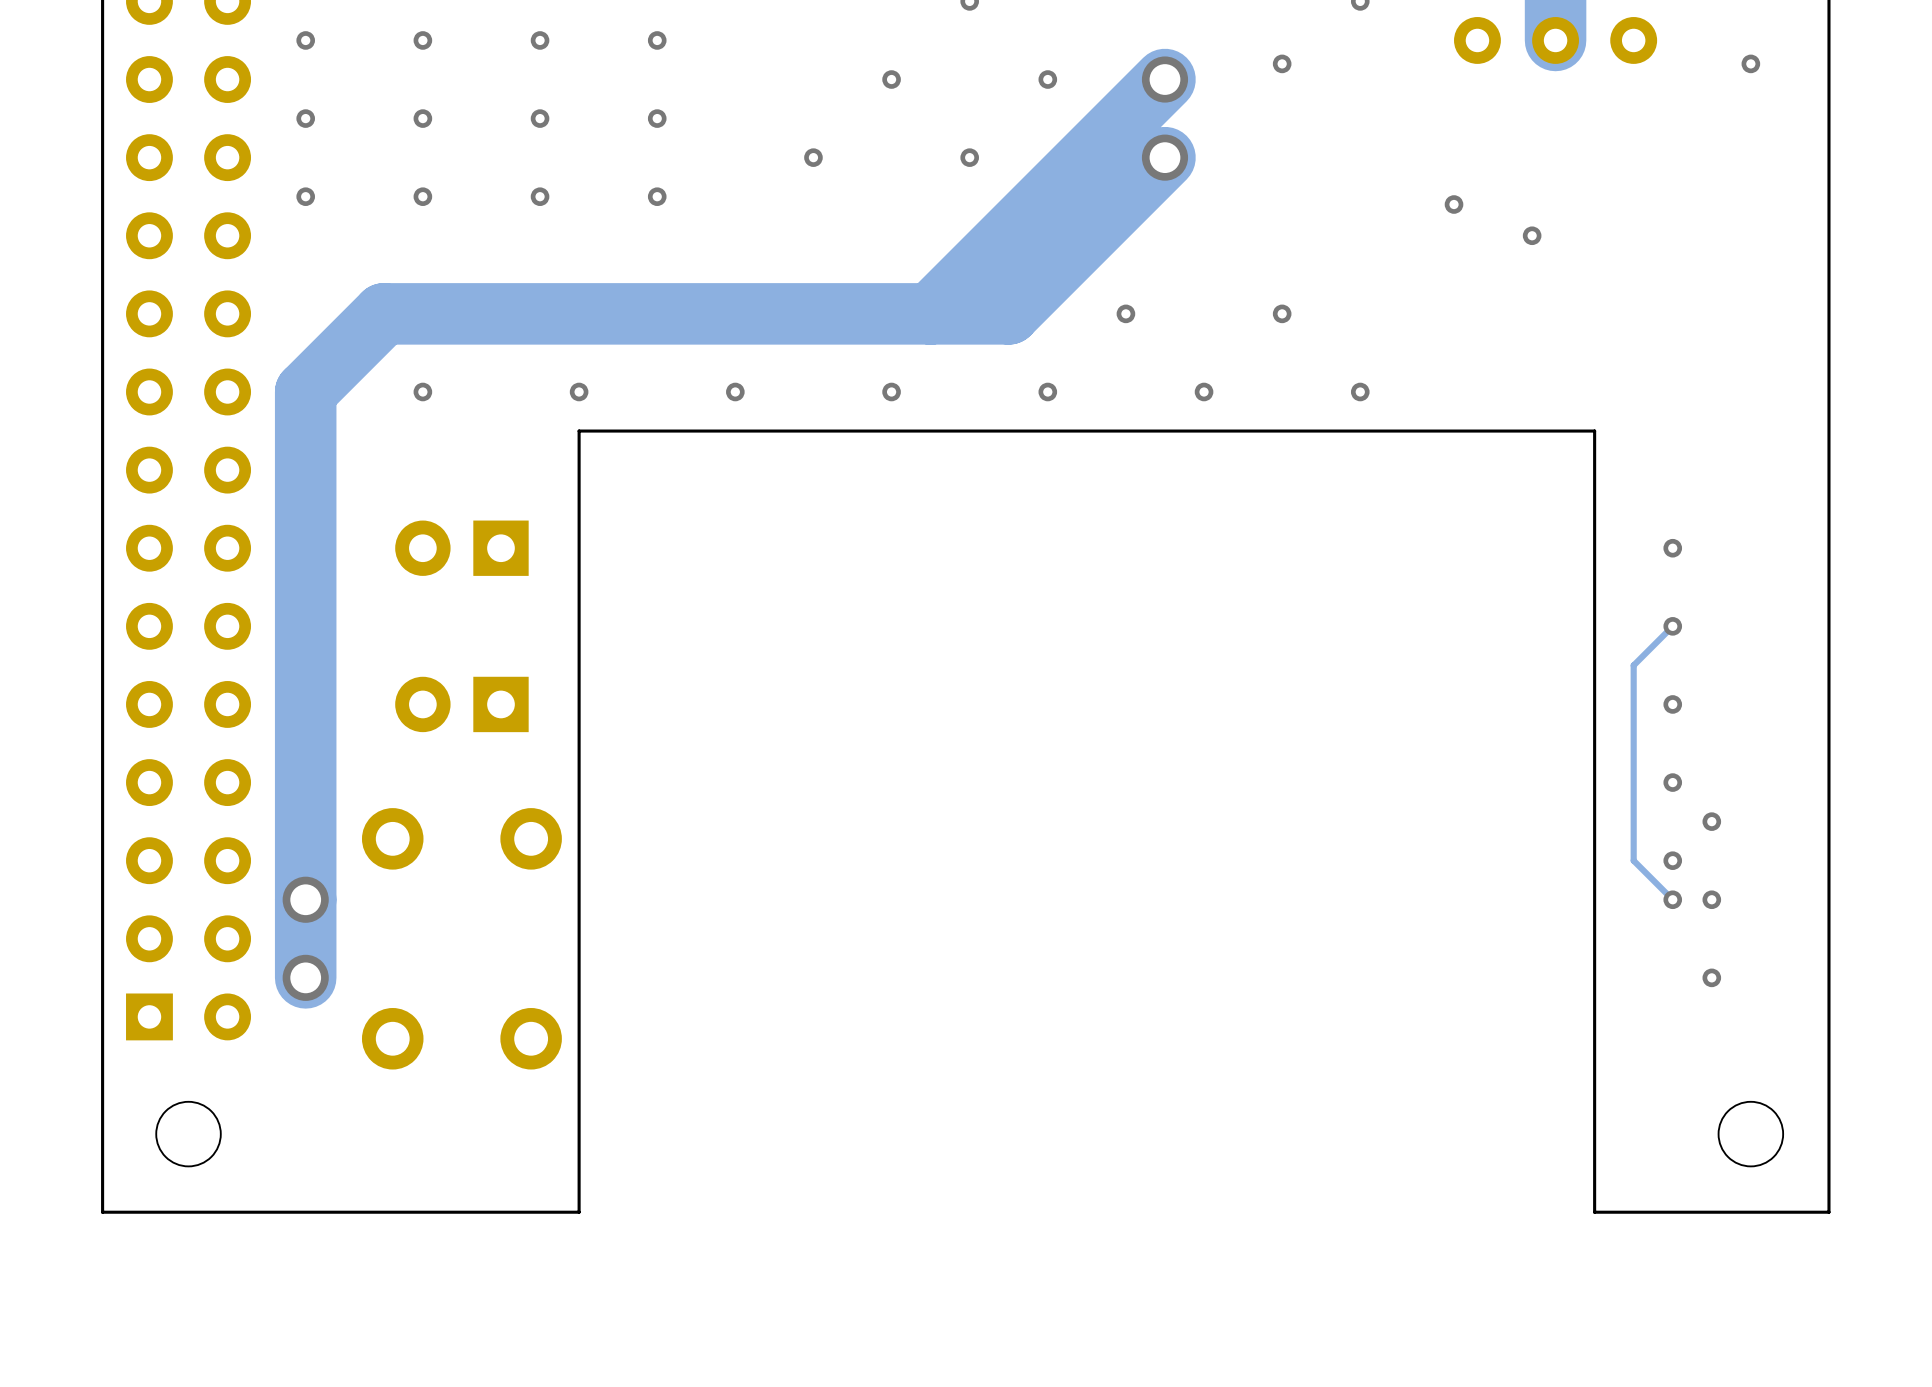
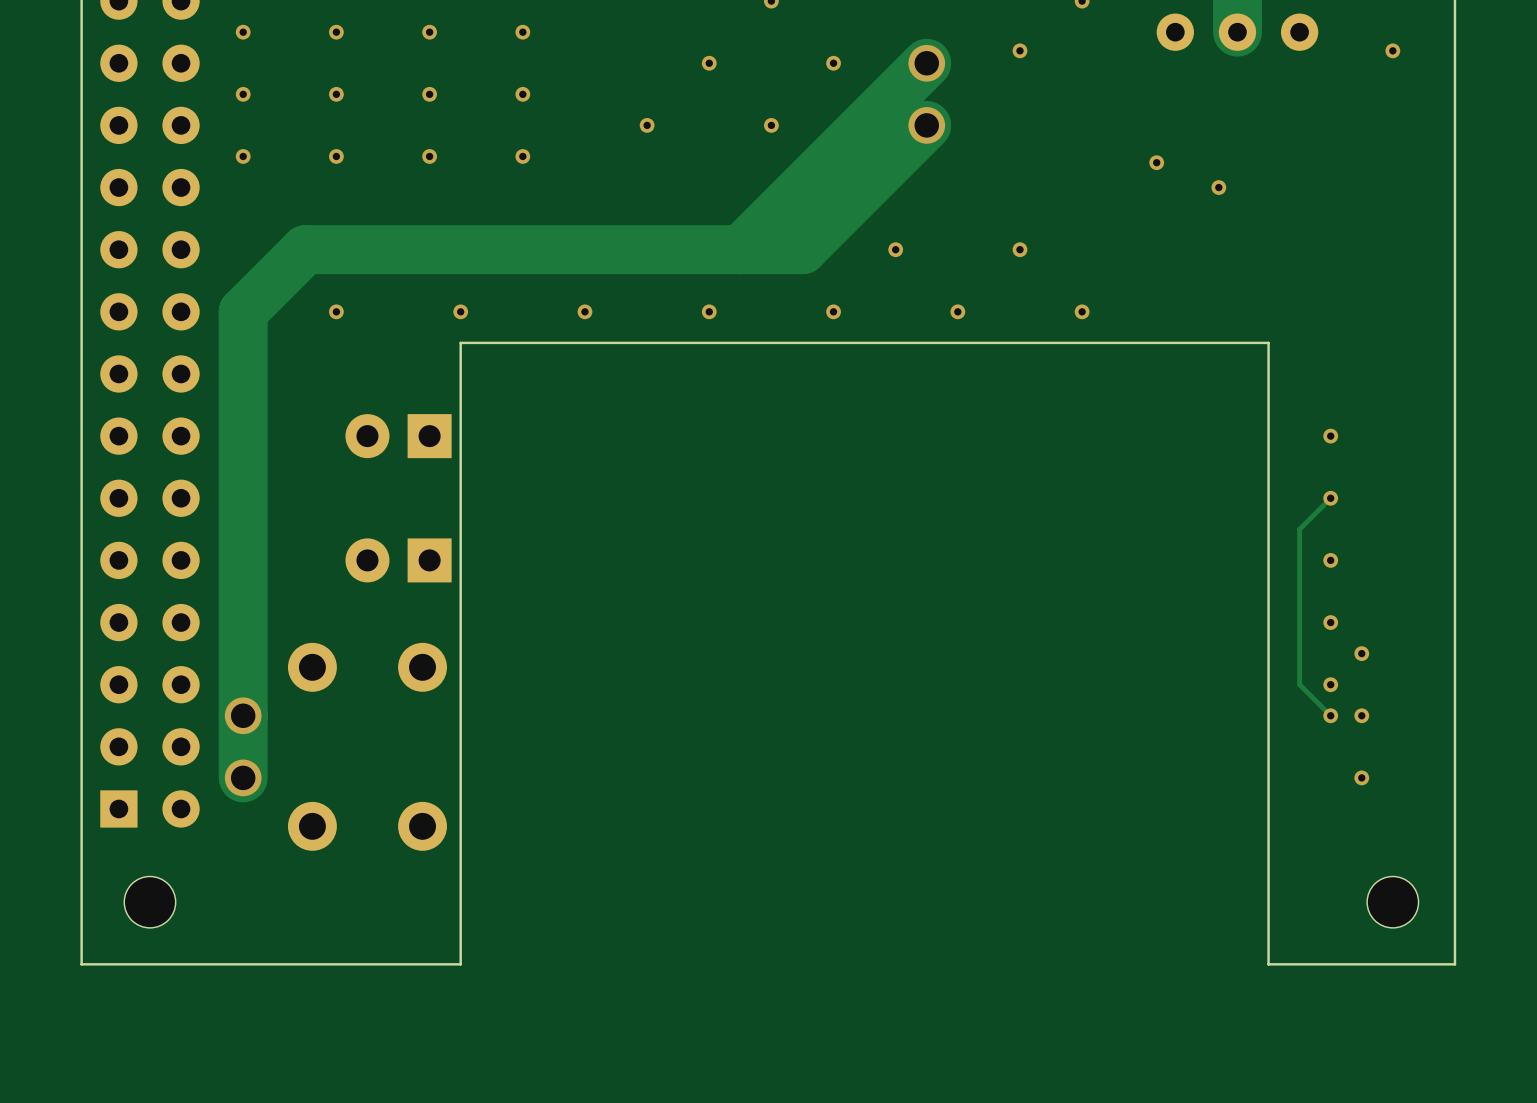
part position: (461, 548) -> (398, 436)
part position: (461, 704) -> (398, 560)

